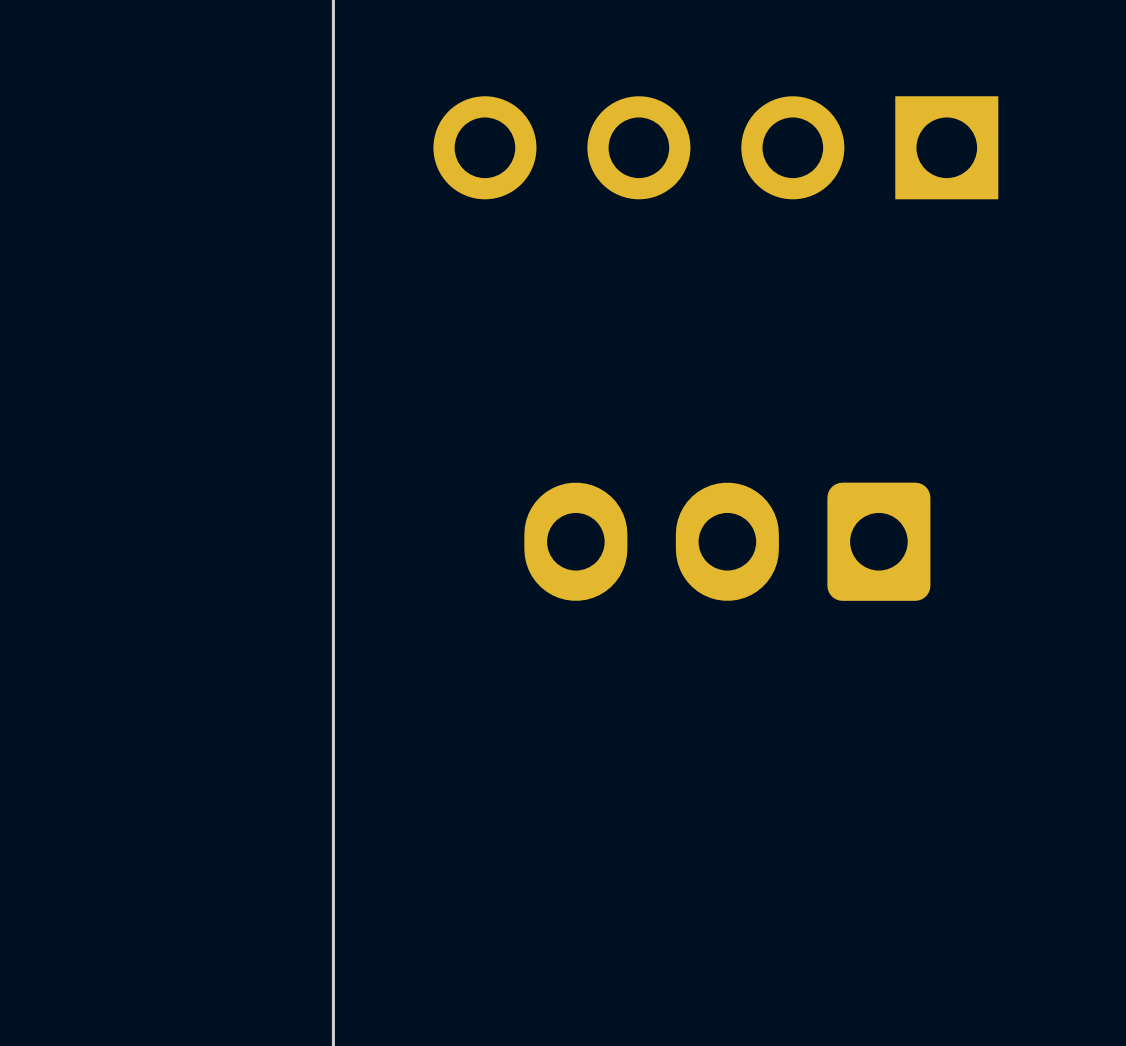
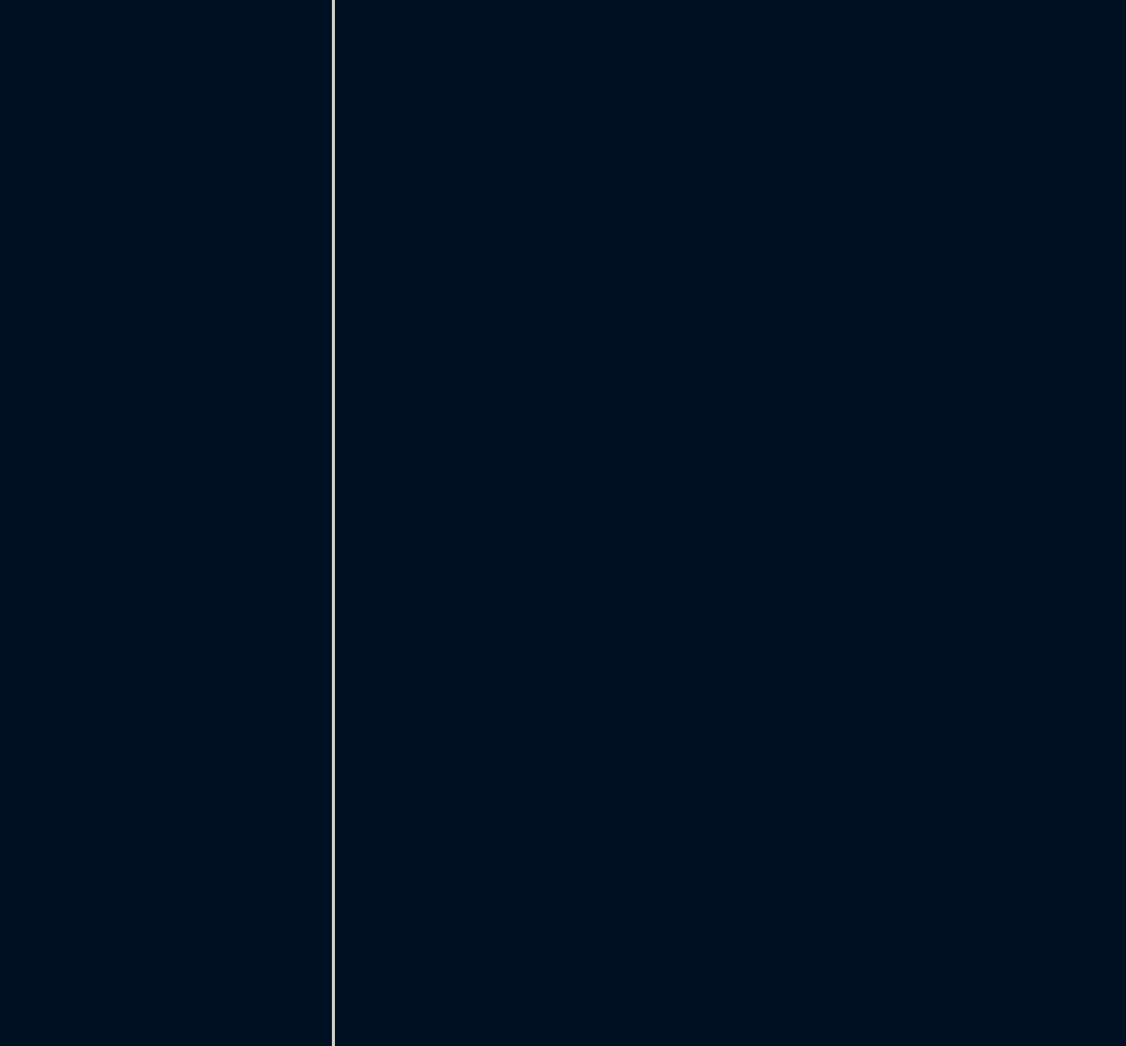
part: (715, 147) -> none
part: (727, 541) -> none

